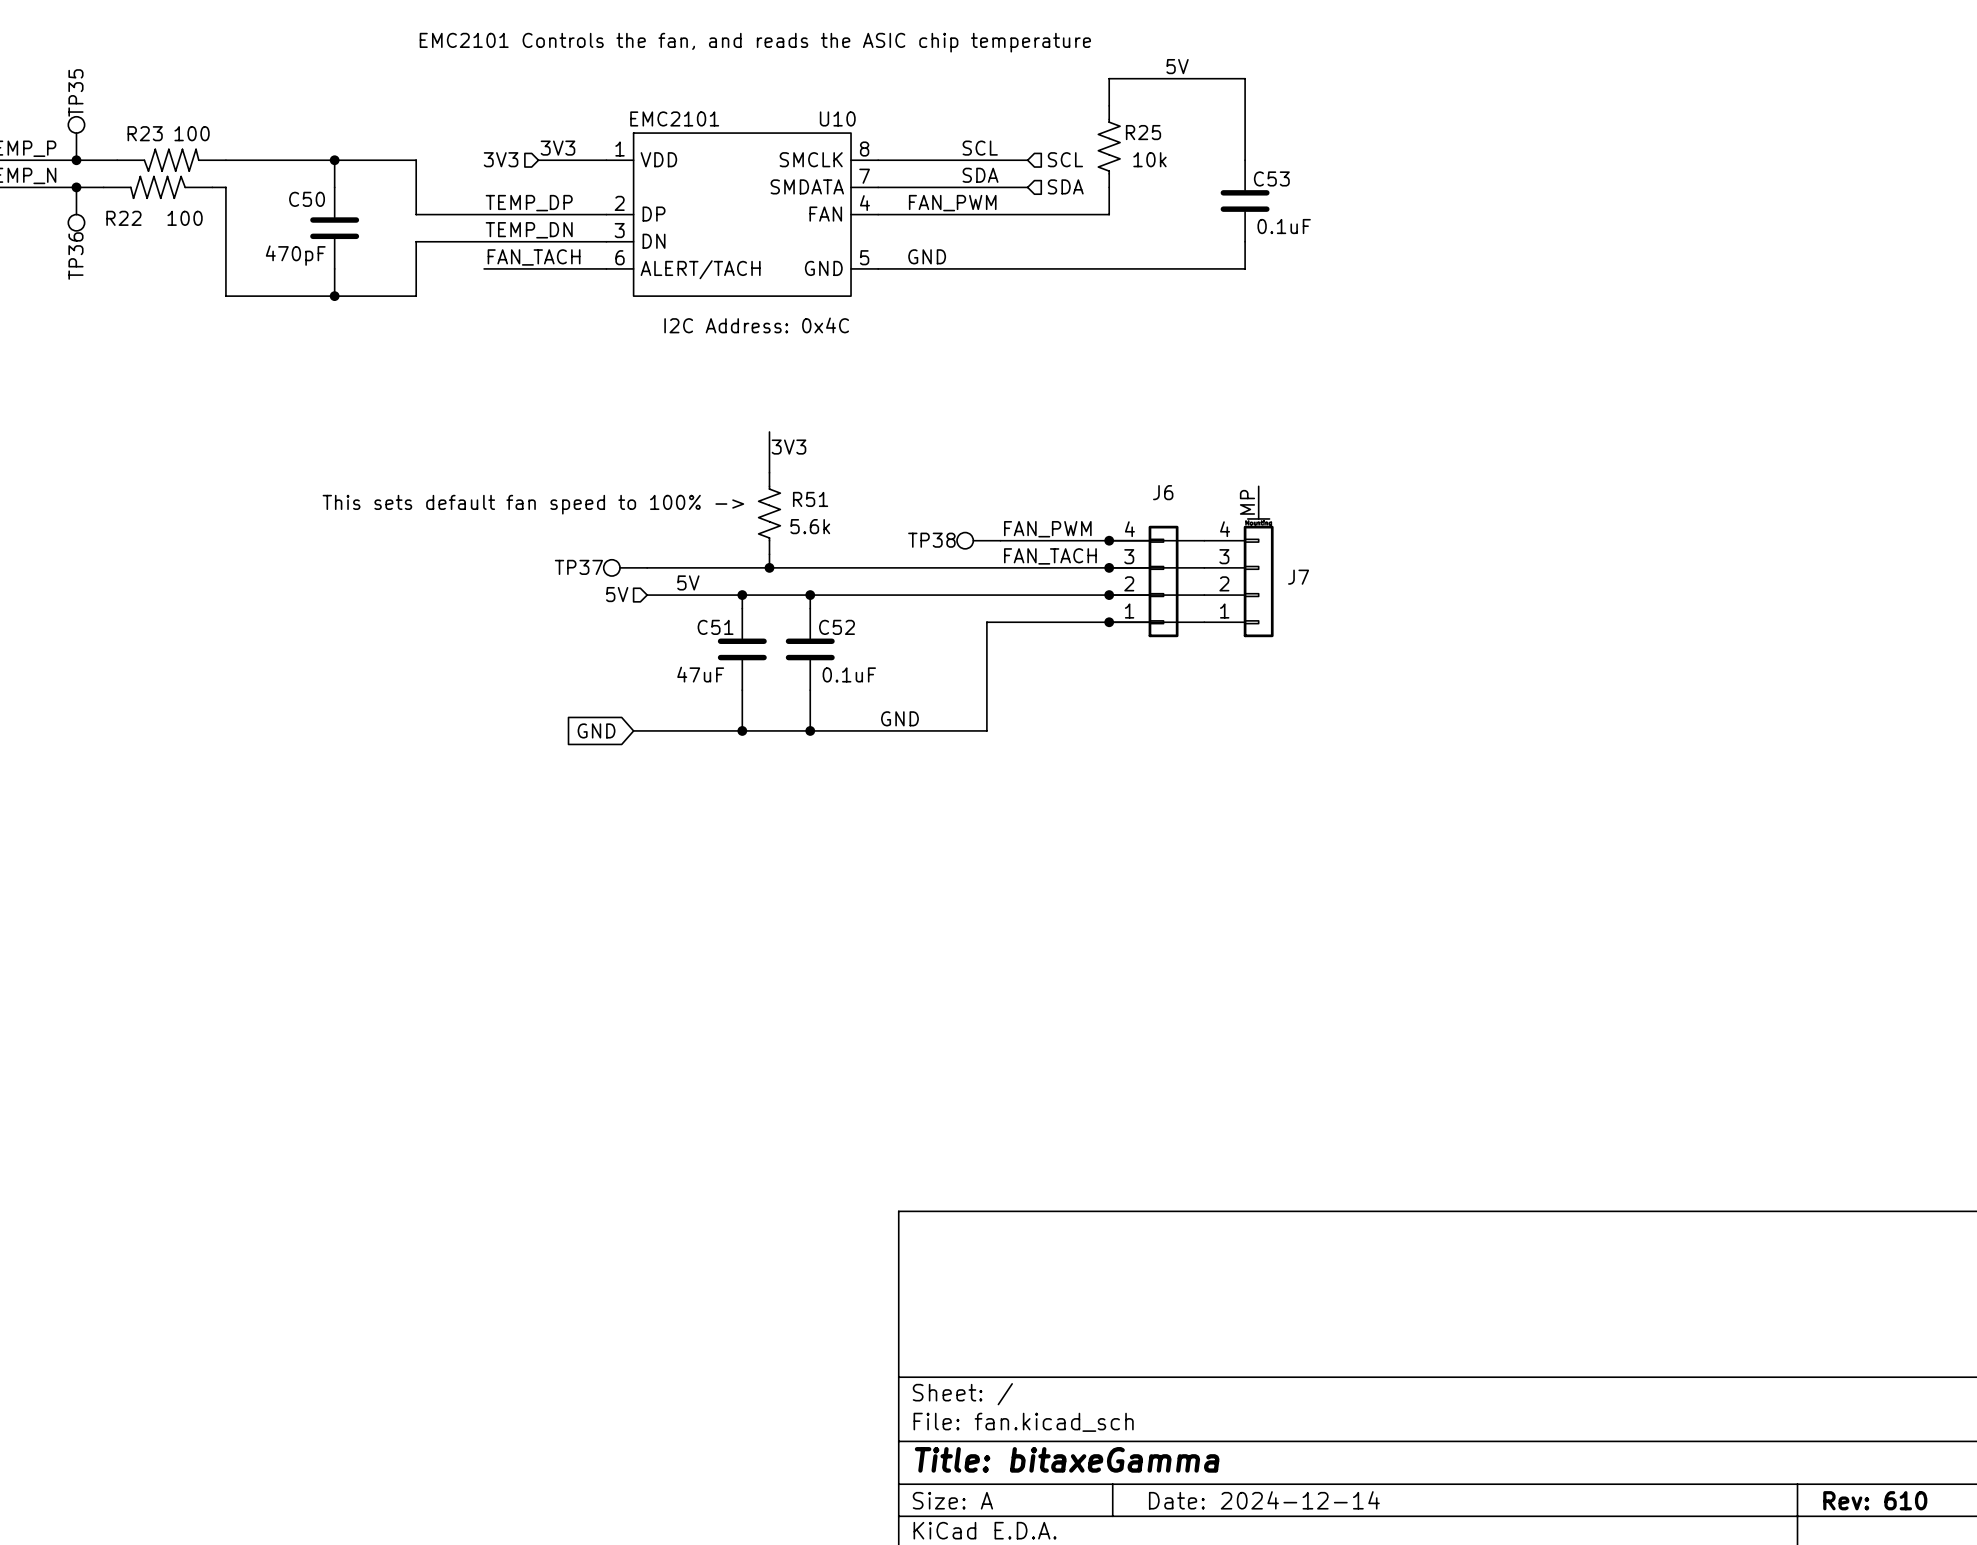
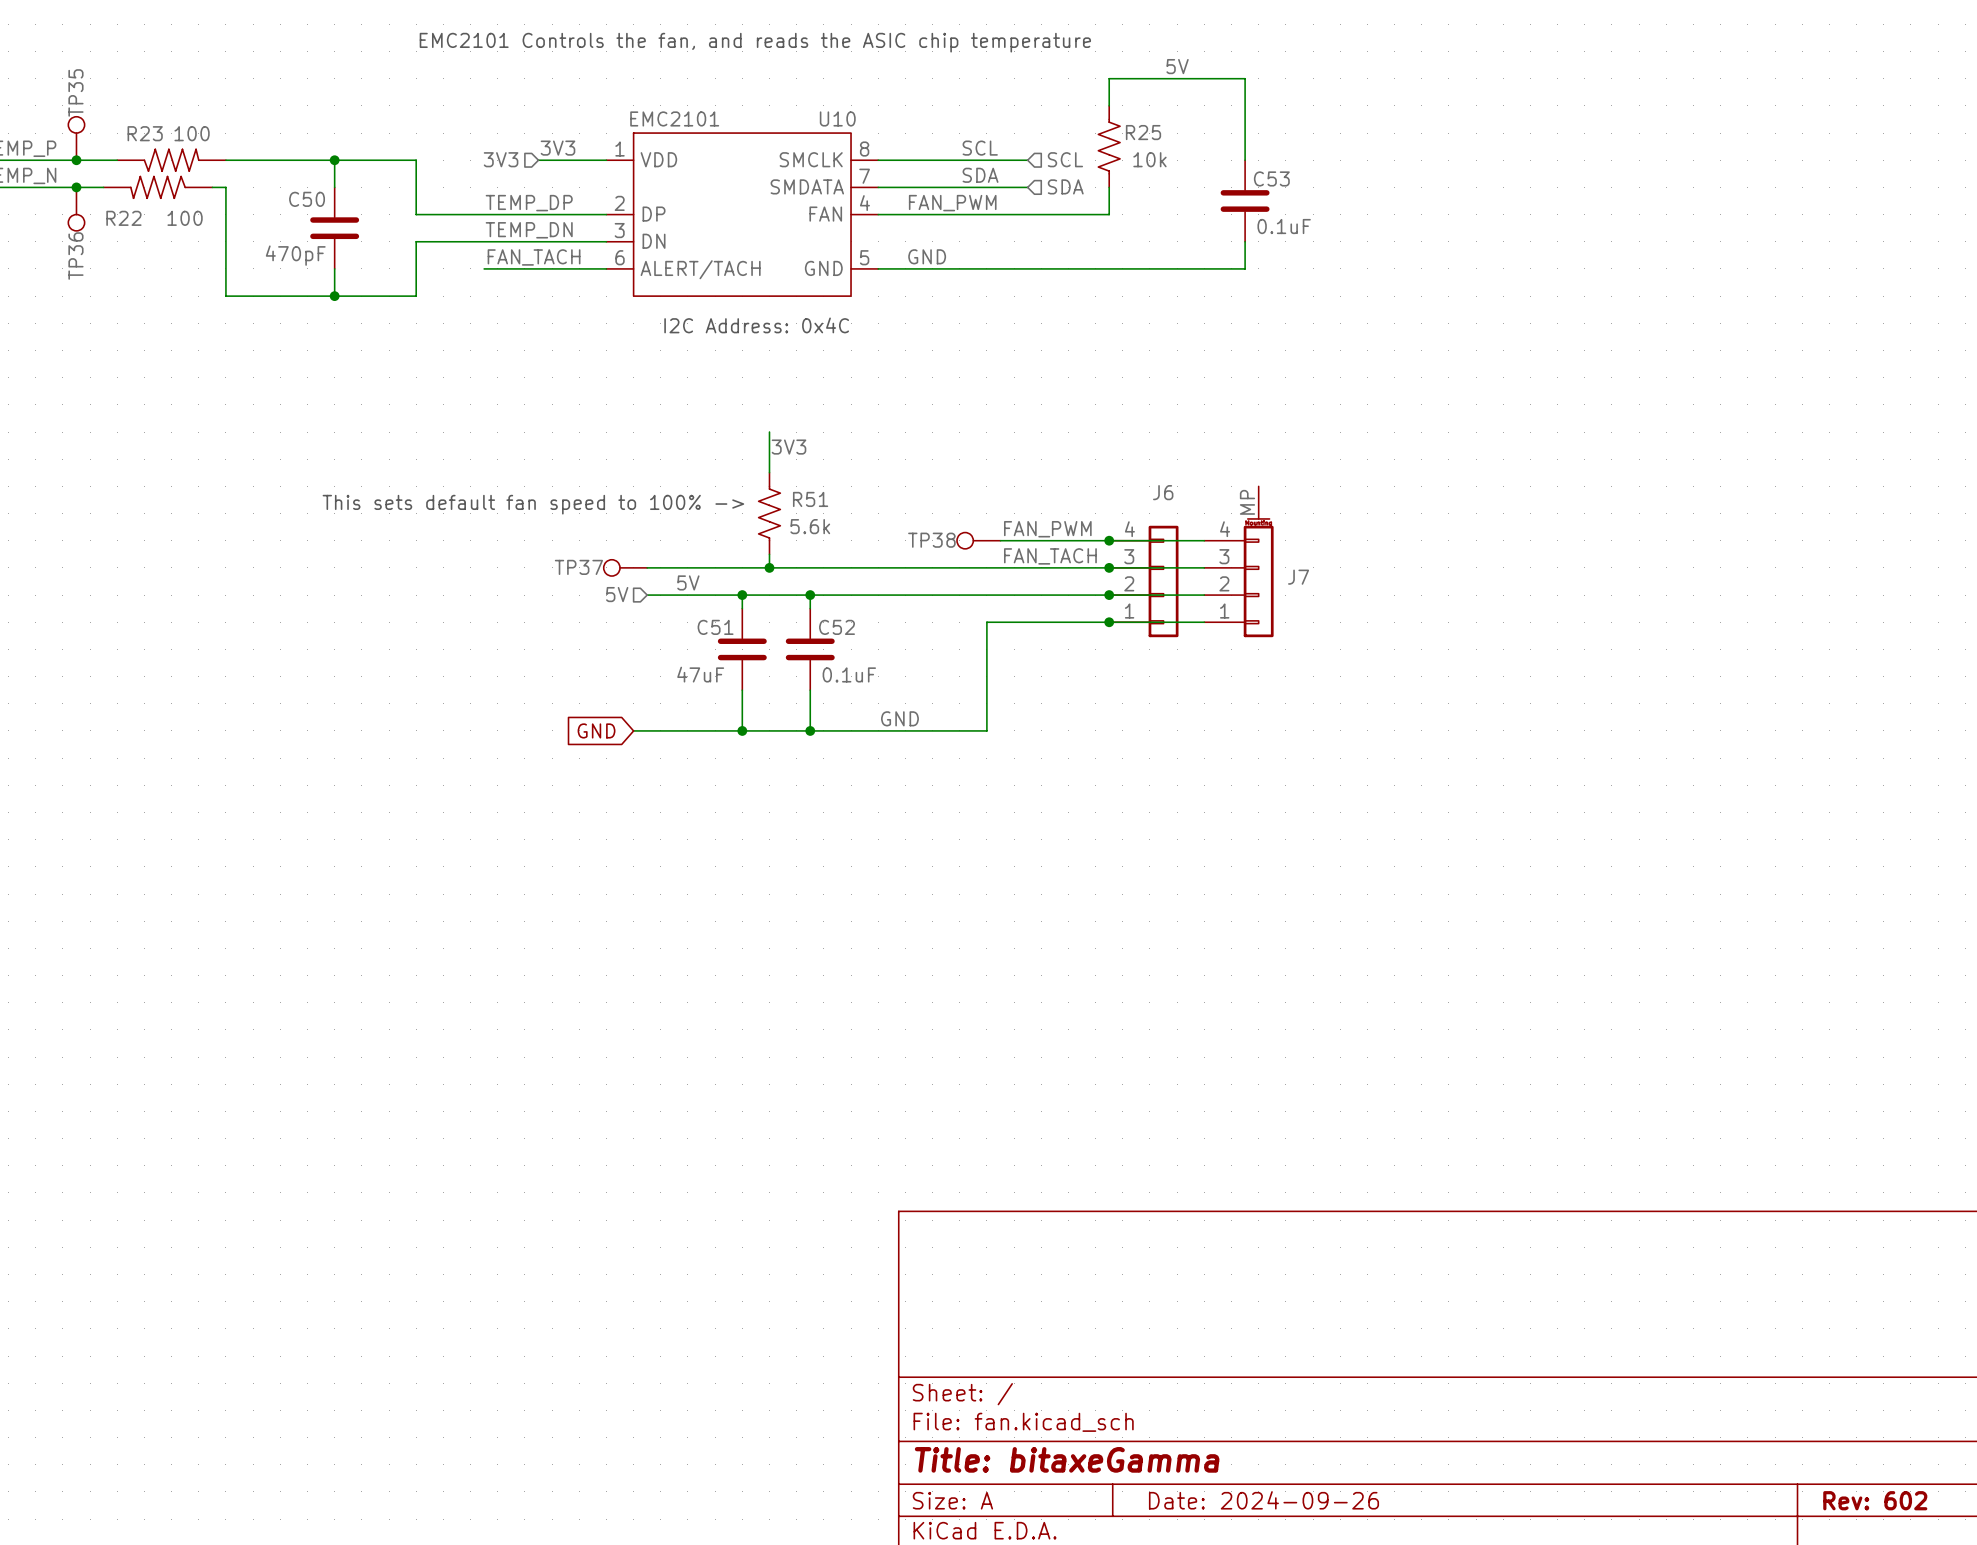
title block: Date: 2024-12-14 (1264, 1500) -> Date: 2024-09-26 (1263, 1500)
title block: Rev: 610 (1875, 1500) -> Rev: 602 (1875, 1500)

